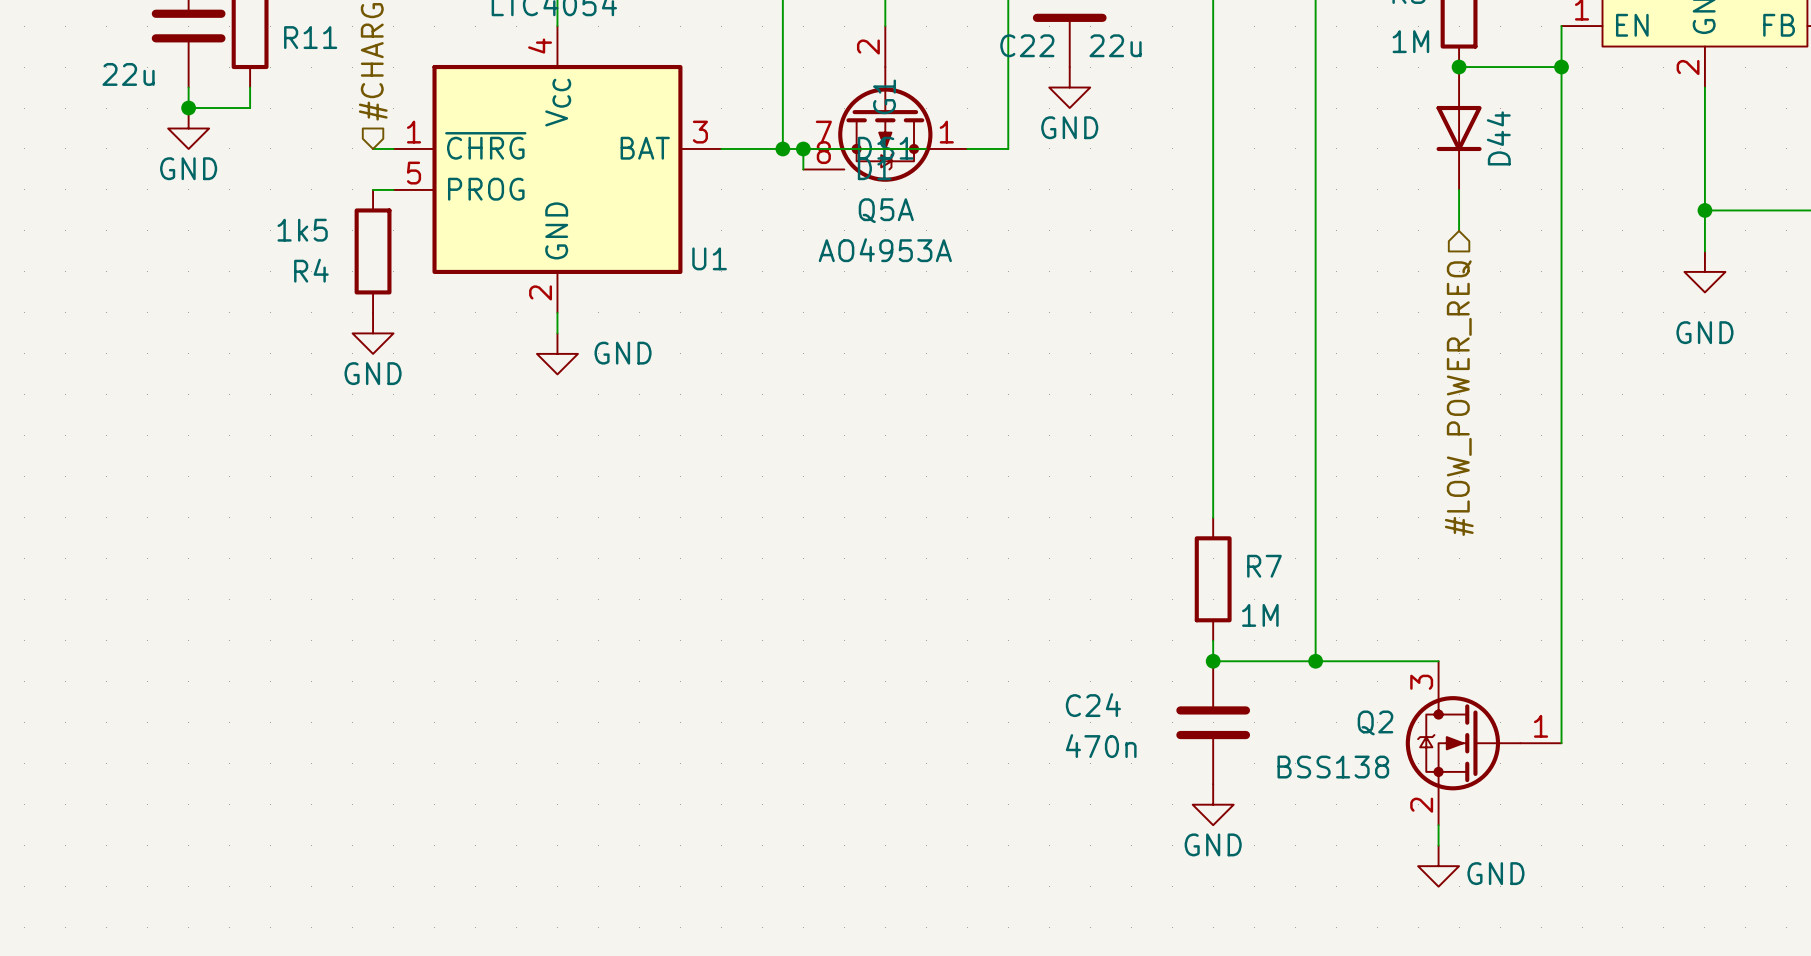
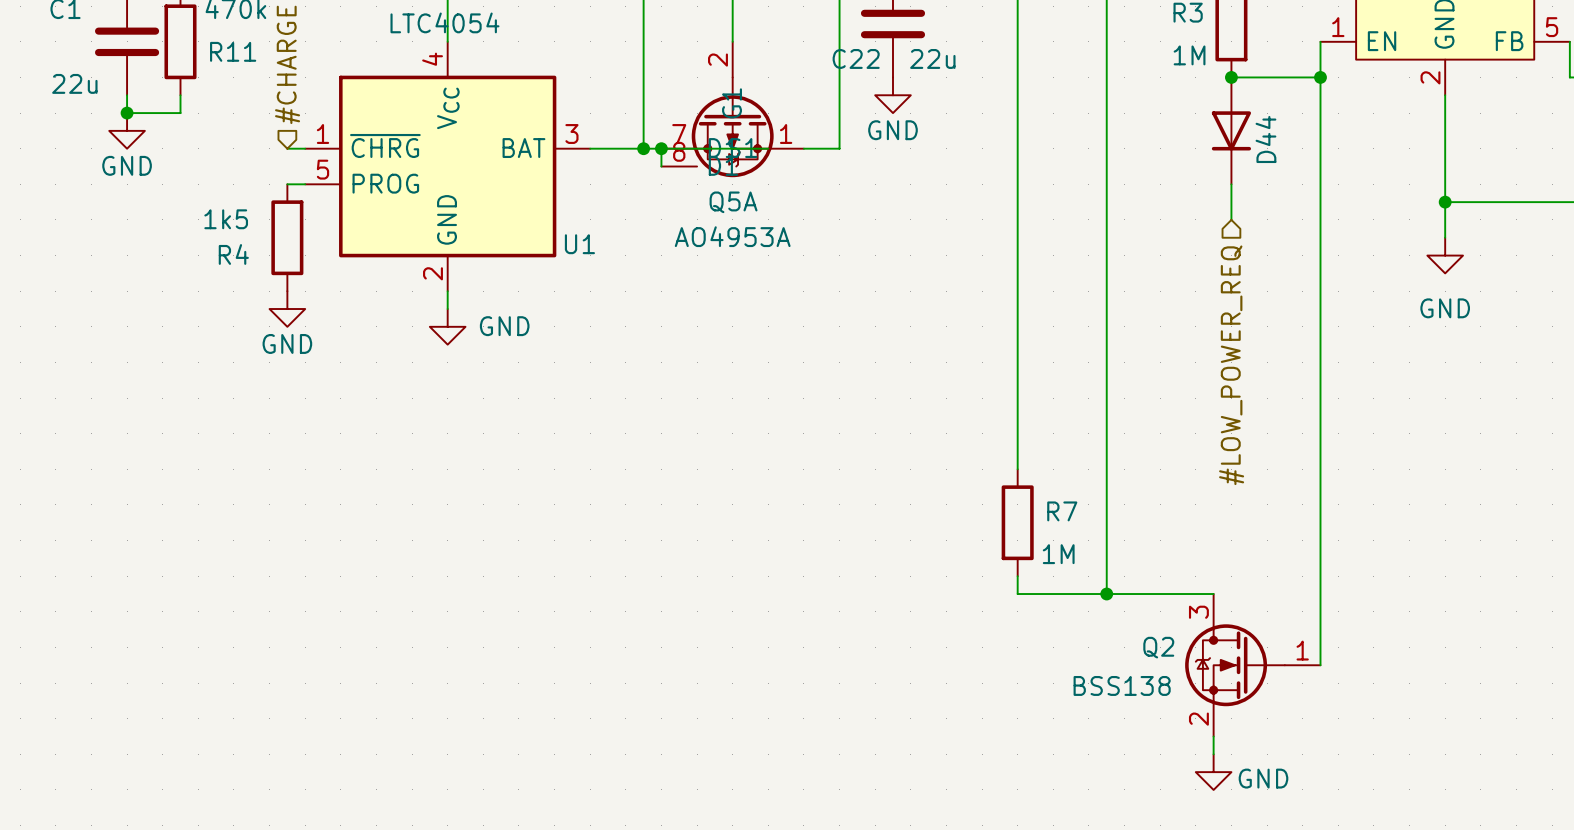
junction: (1213, 661) -> none
C24: 470n (1213, 722) -> none
power symbol: GND (1213, 804) -> none

